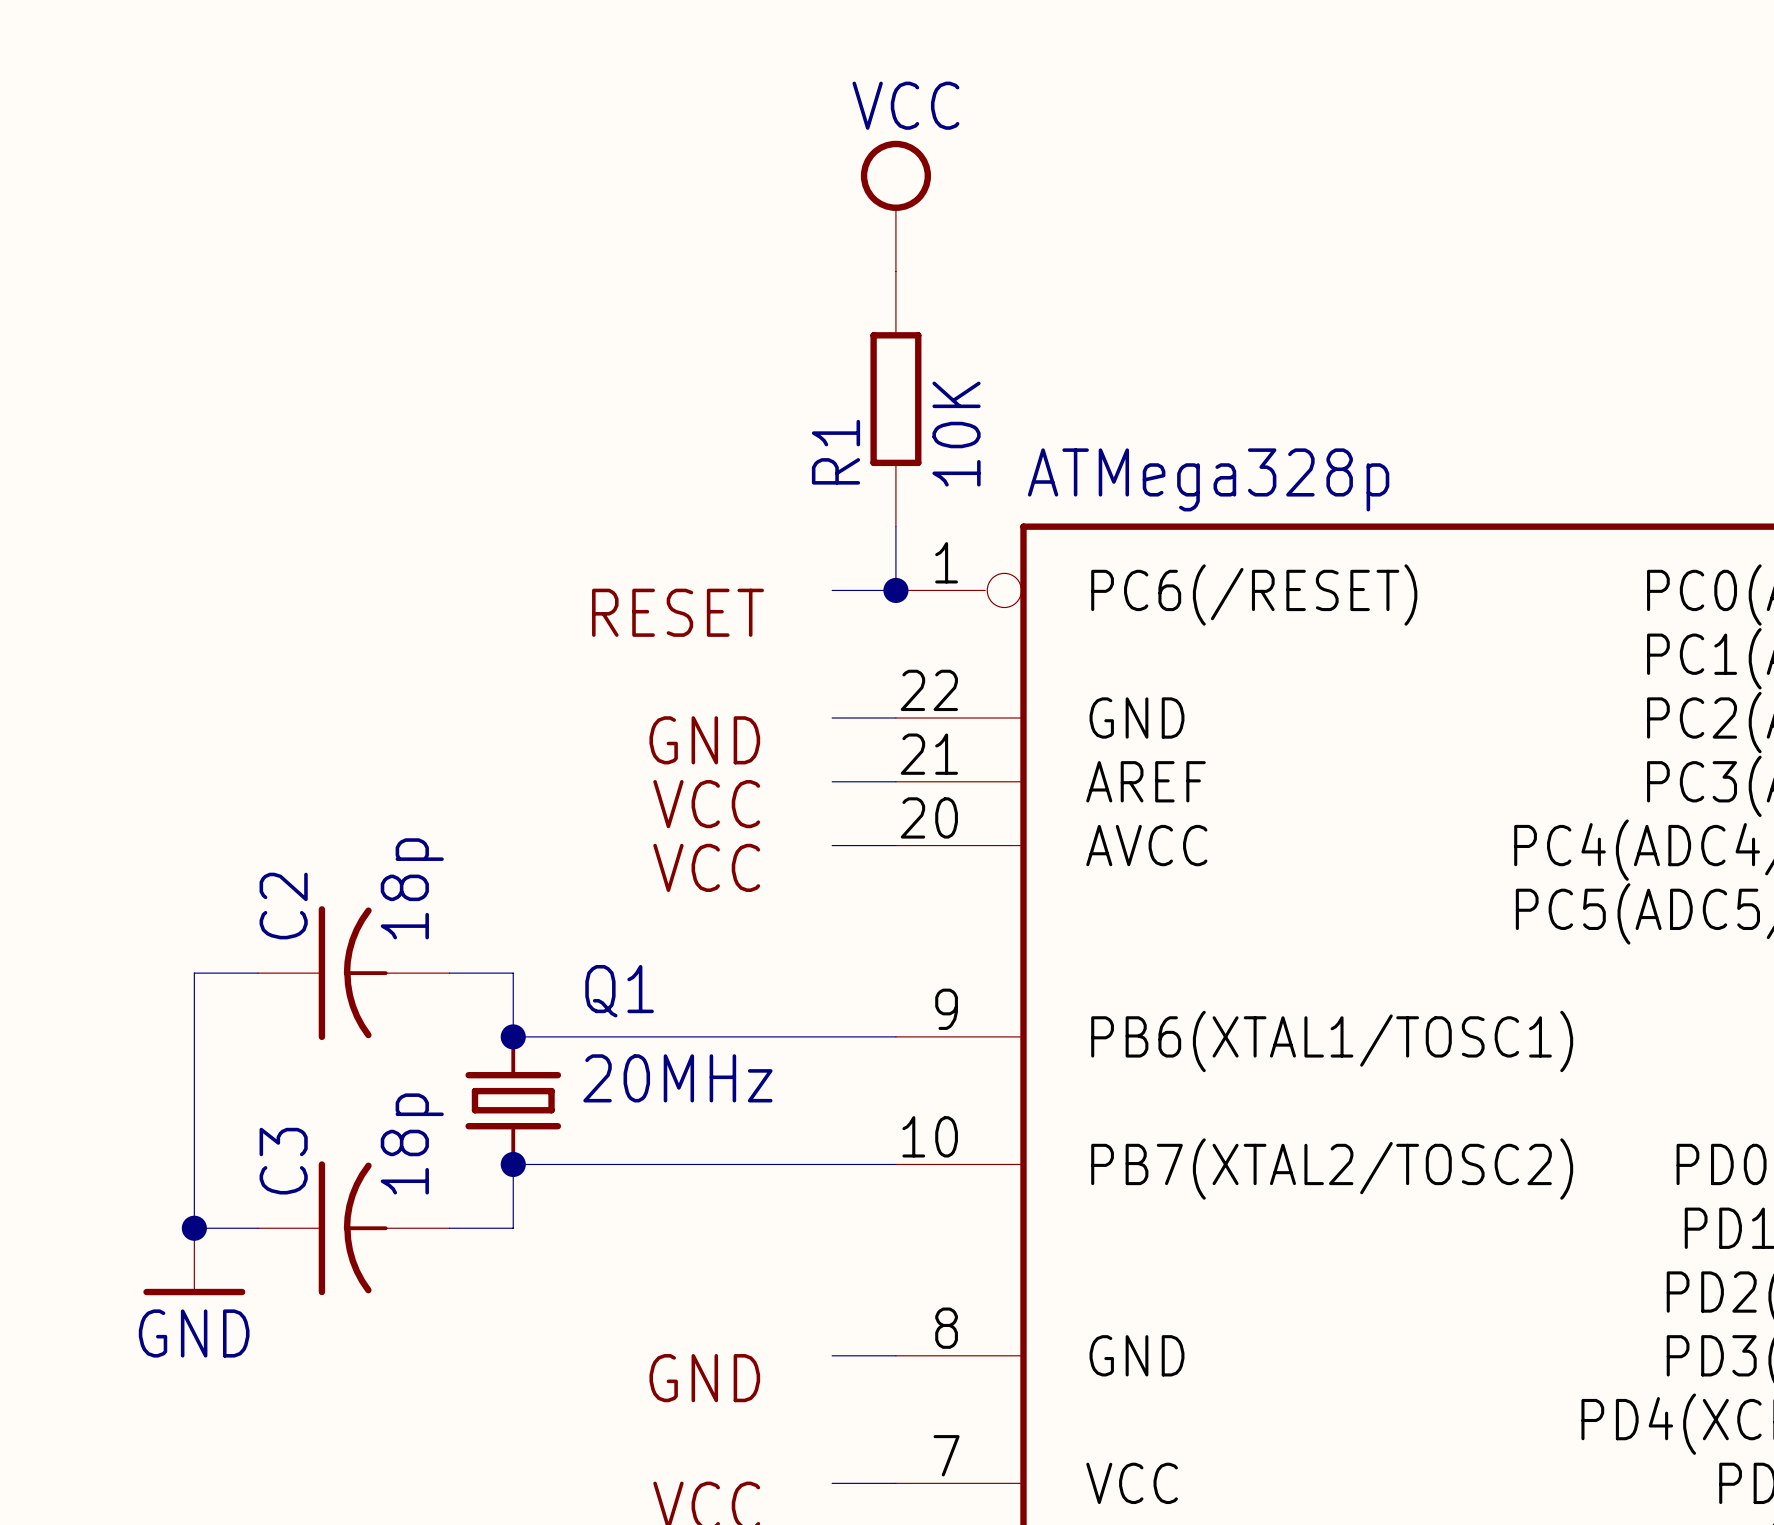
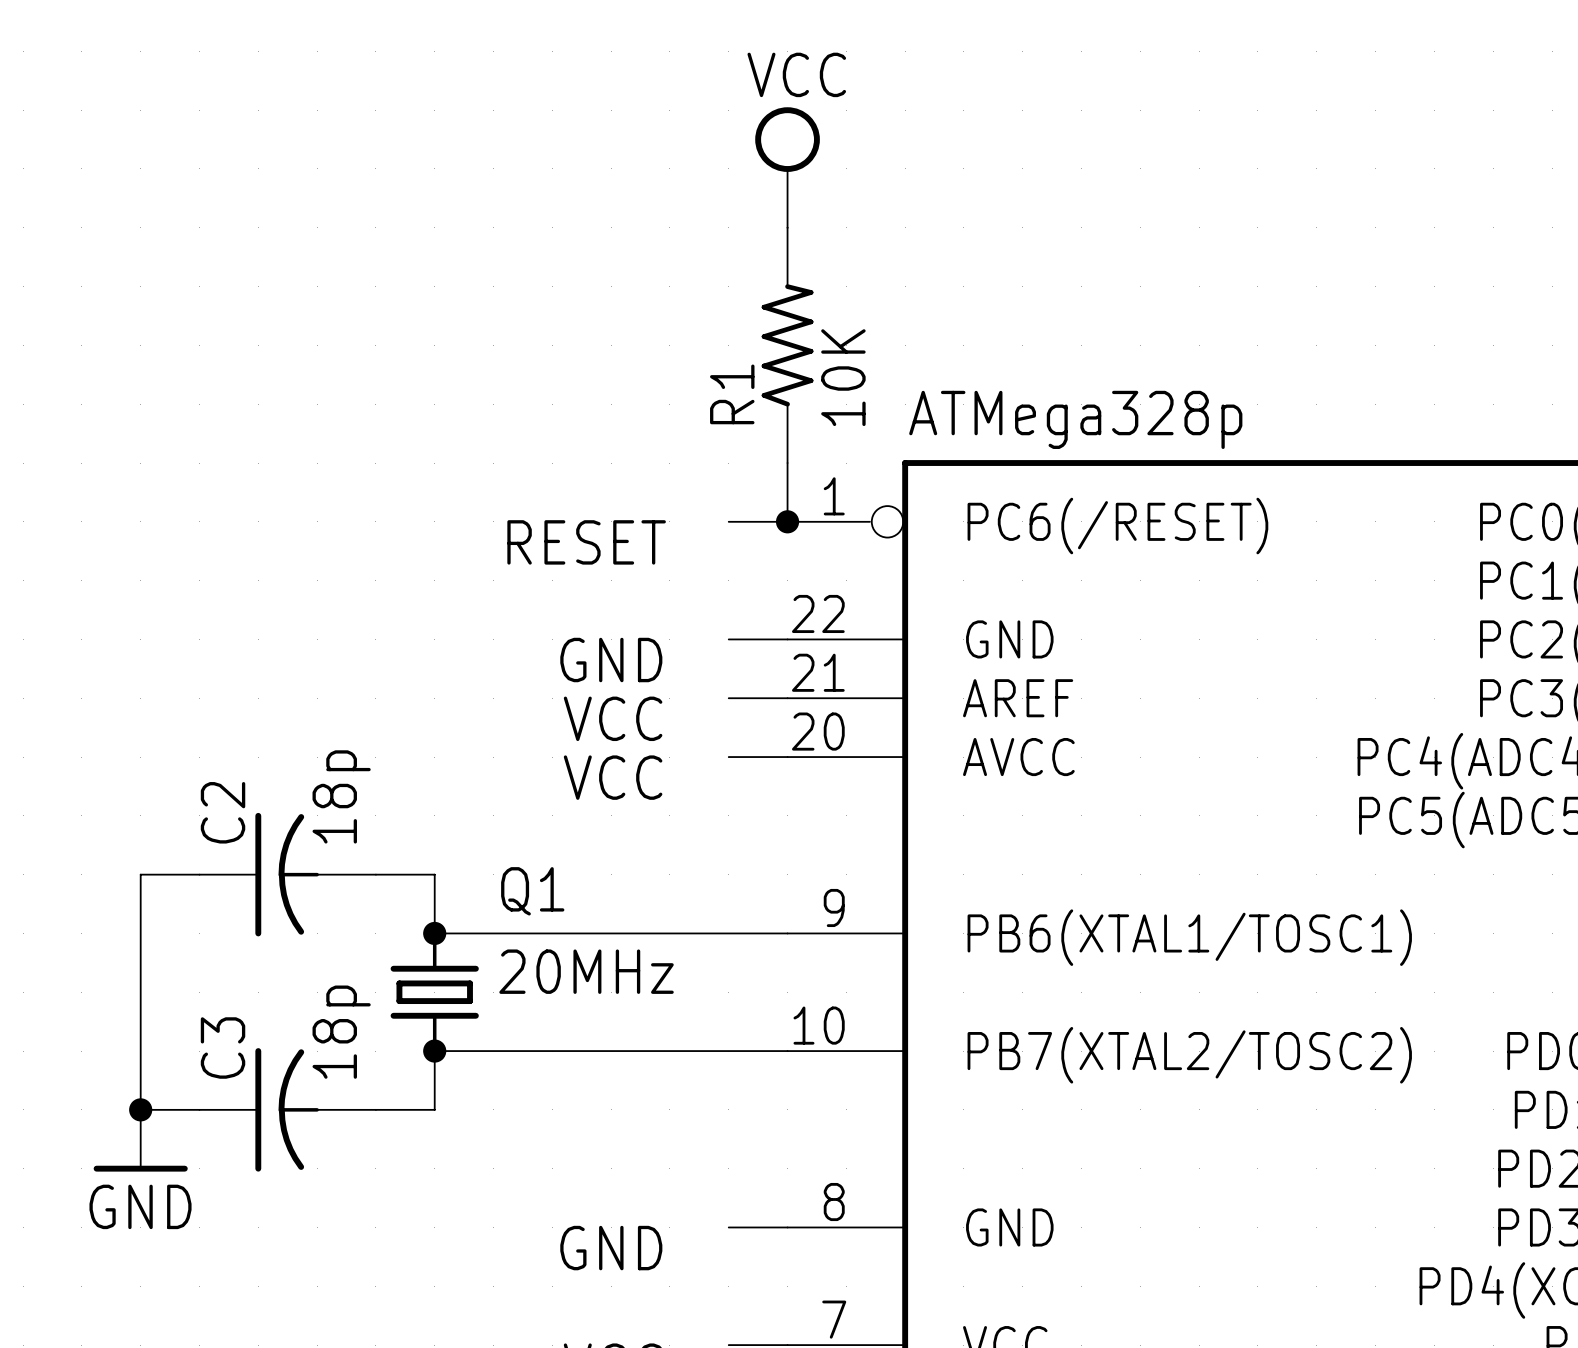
R1 symbol: [870, 271, 922, 527] -> [761, 227, 814, 464]

